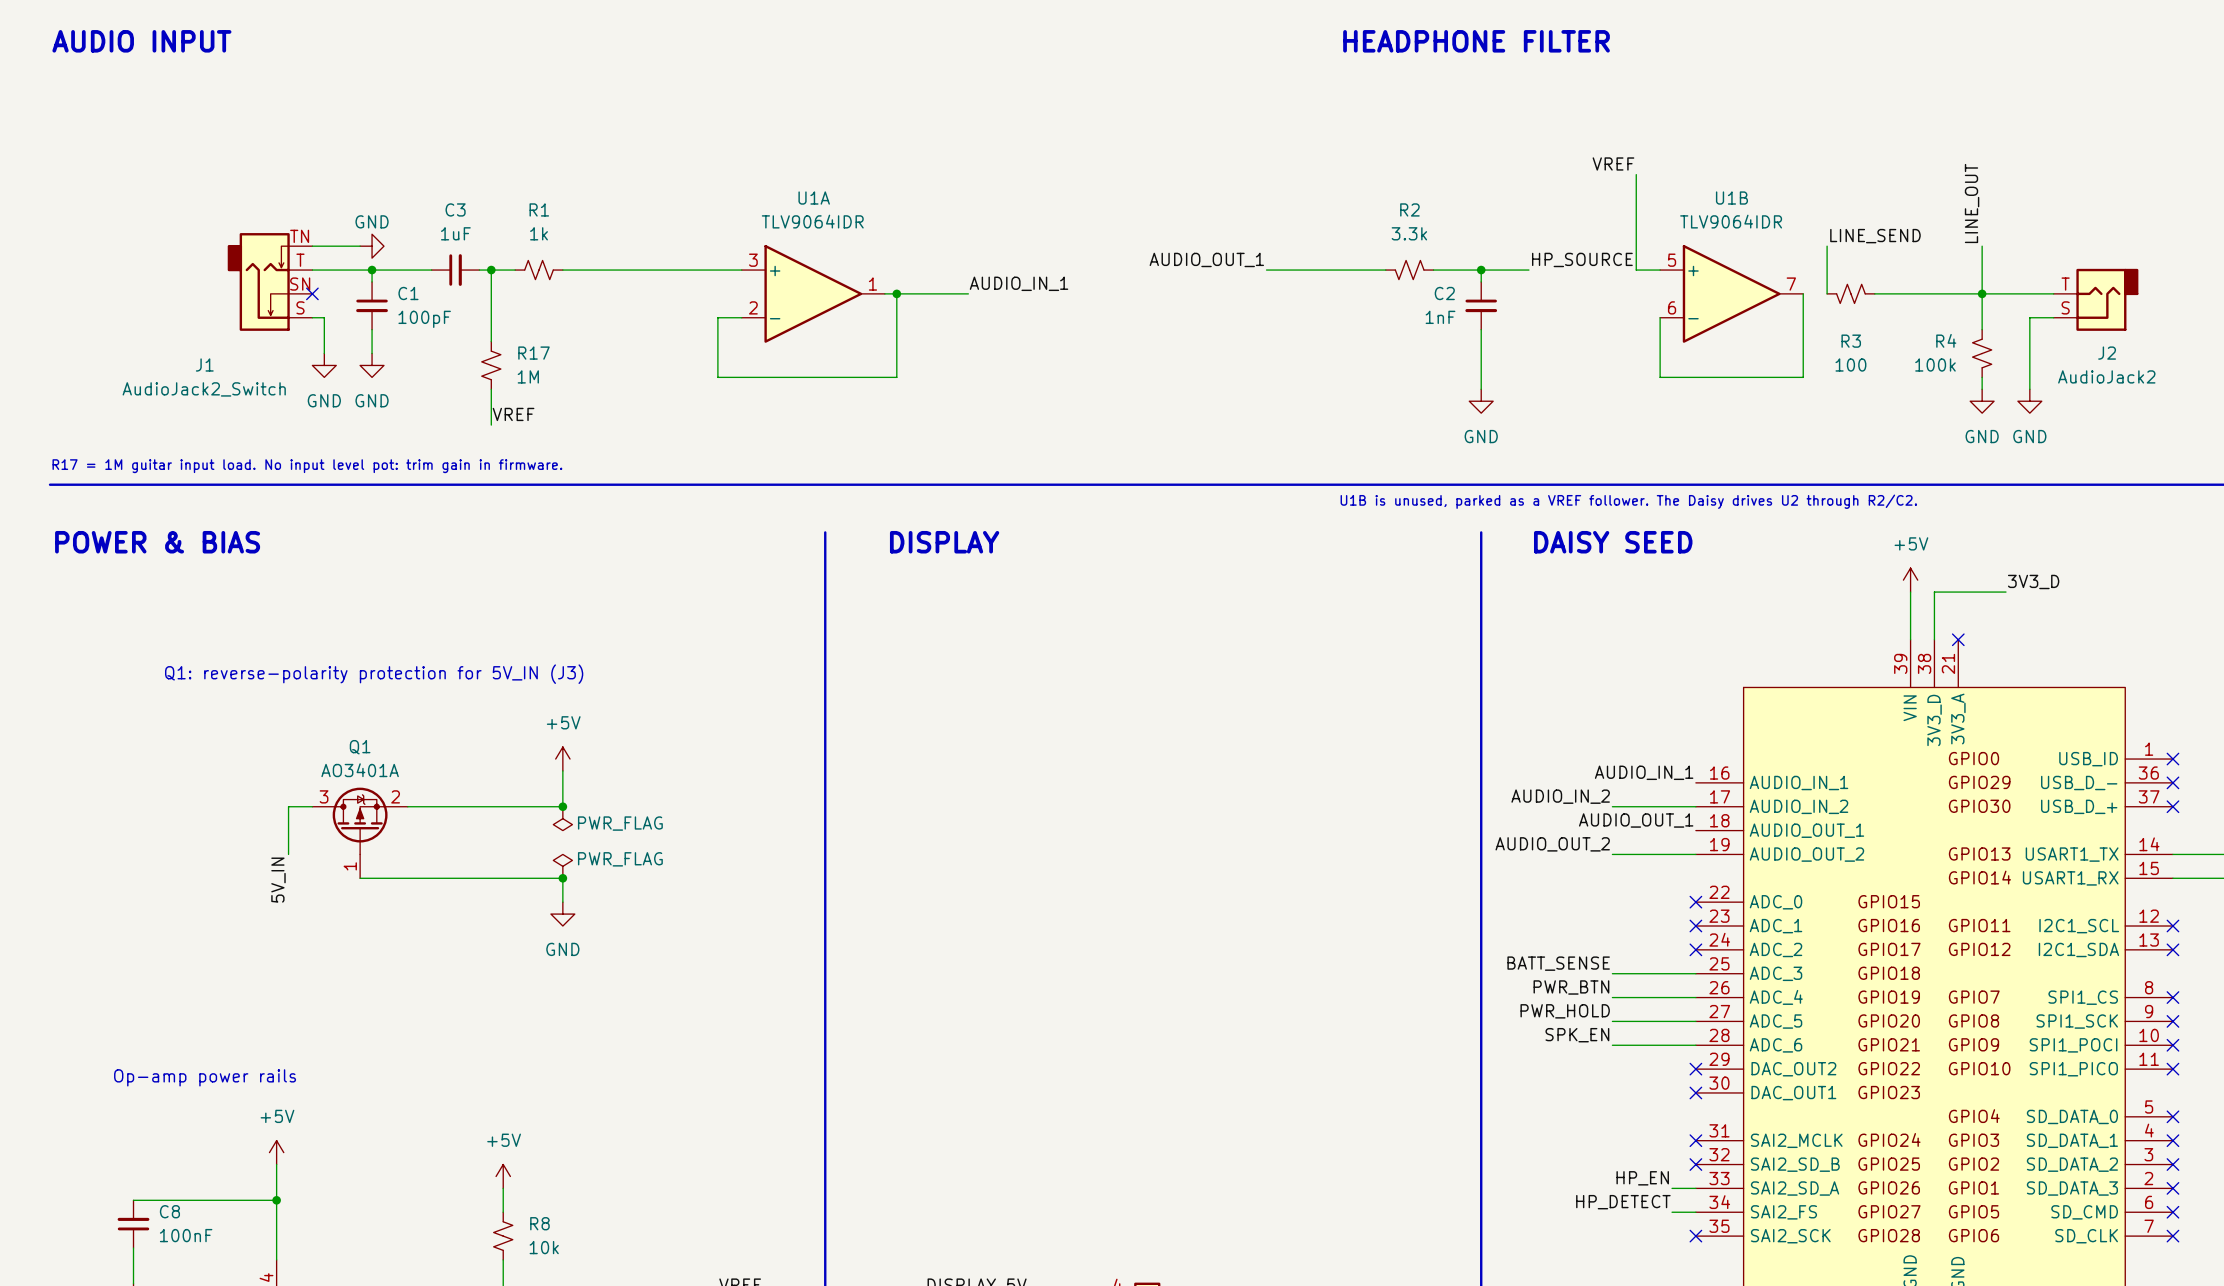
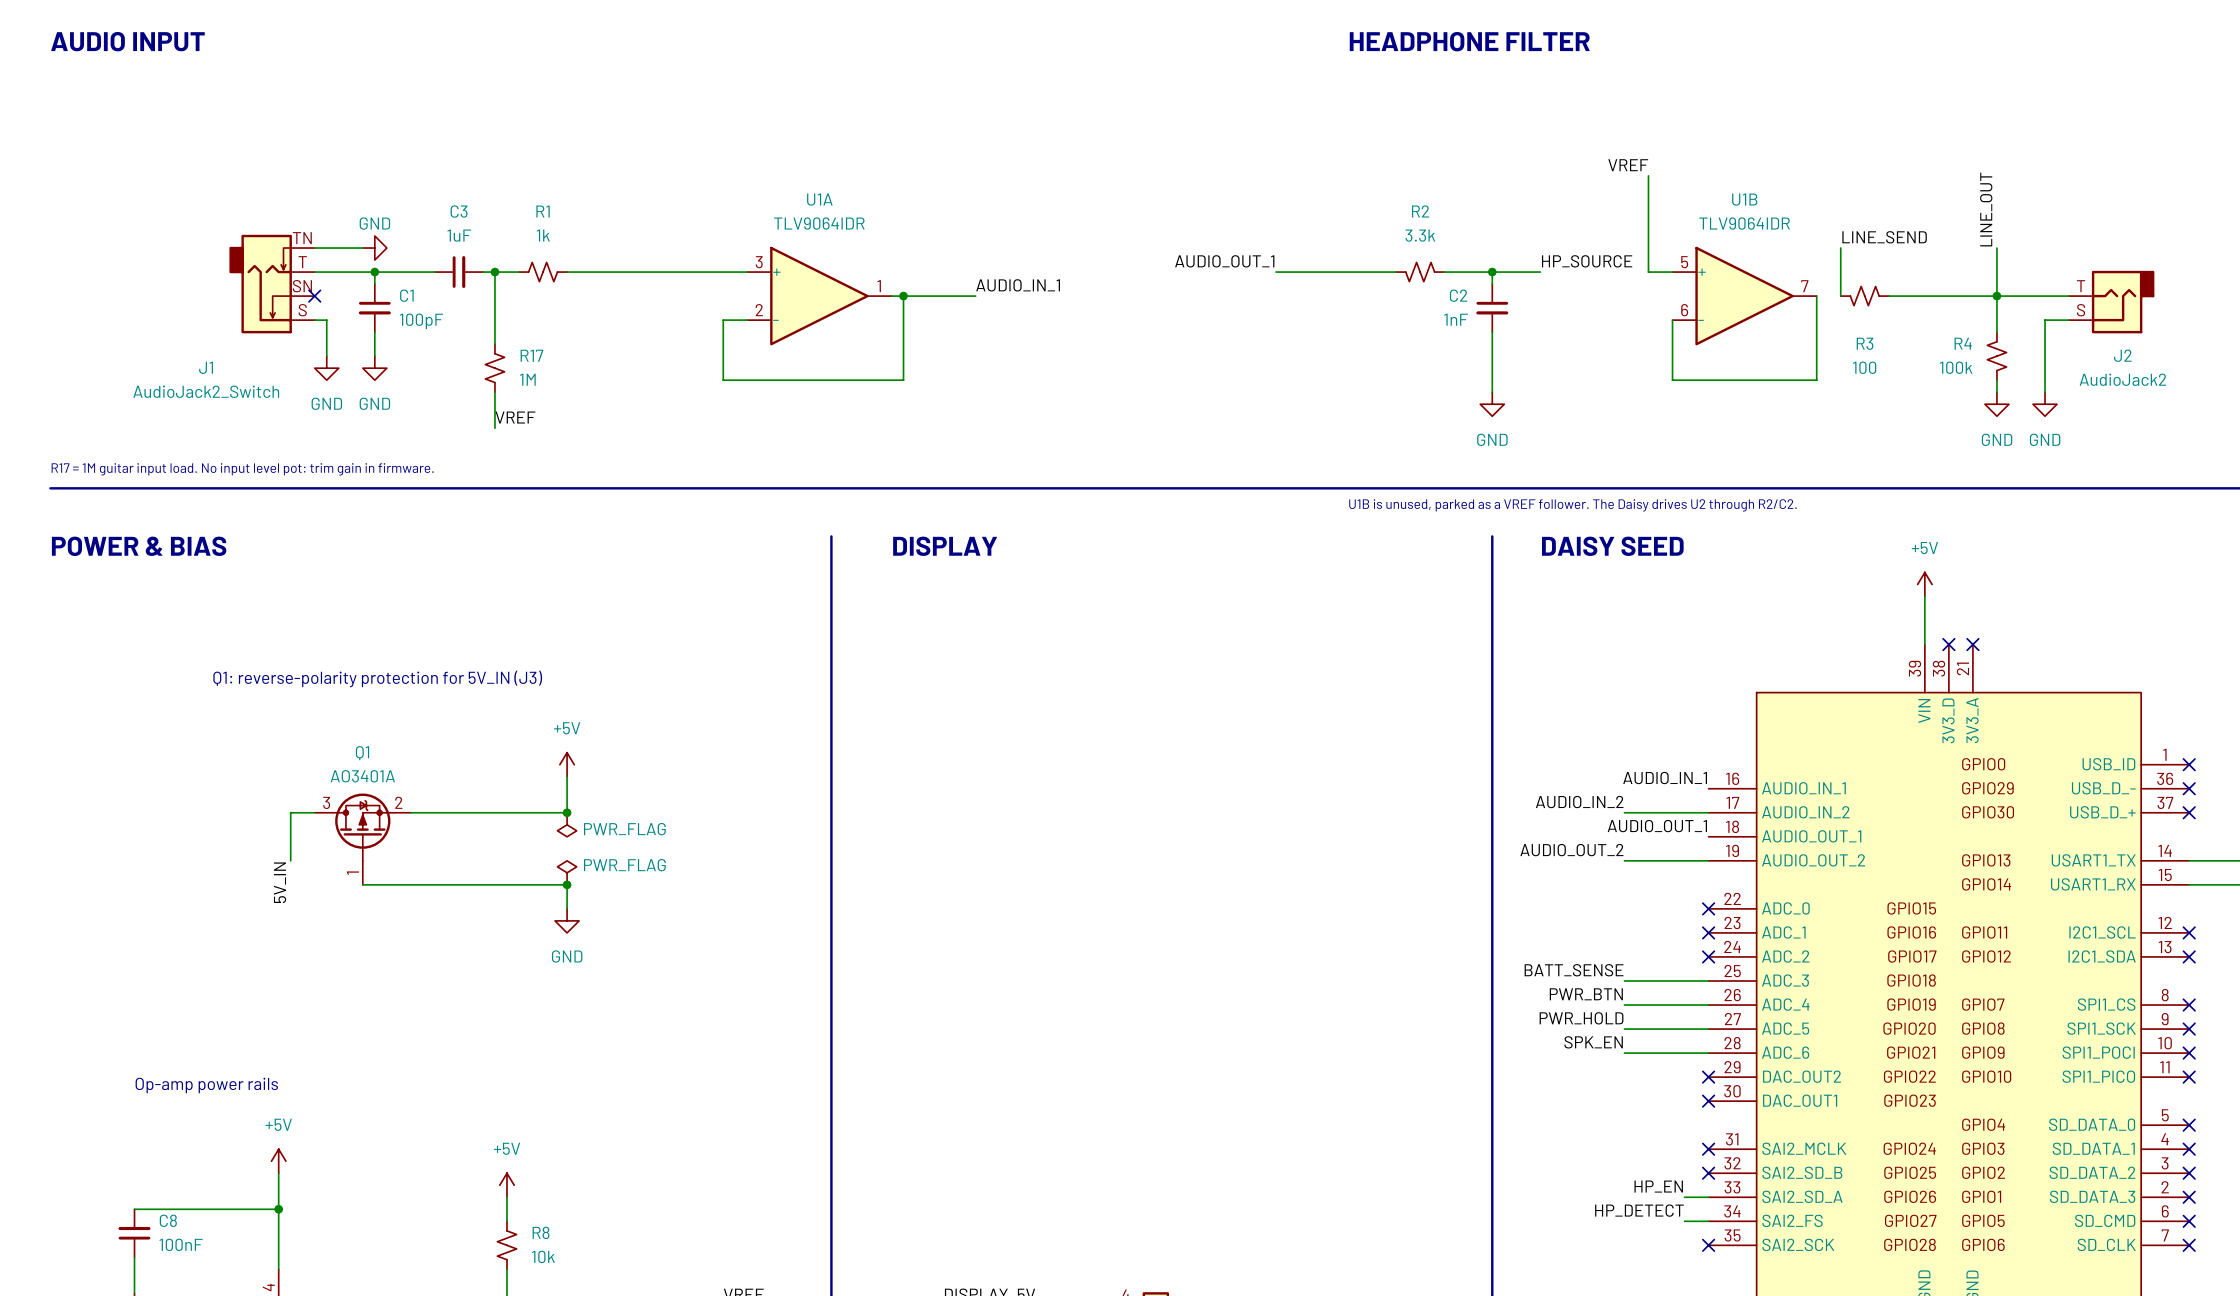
label: 3V3_D (2033, 581) -> none
wire: (2005, 592) (1934, 592) (1934, 639) -> none
no-connect mark: none -> (1948, 644)

